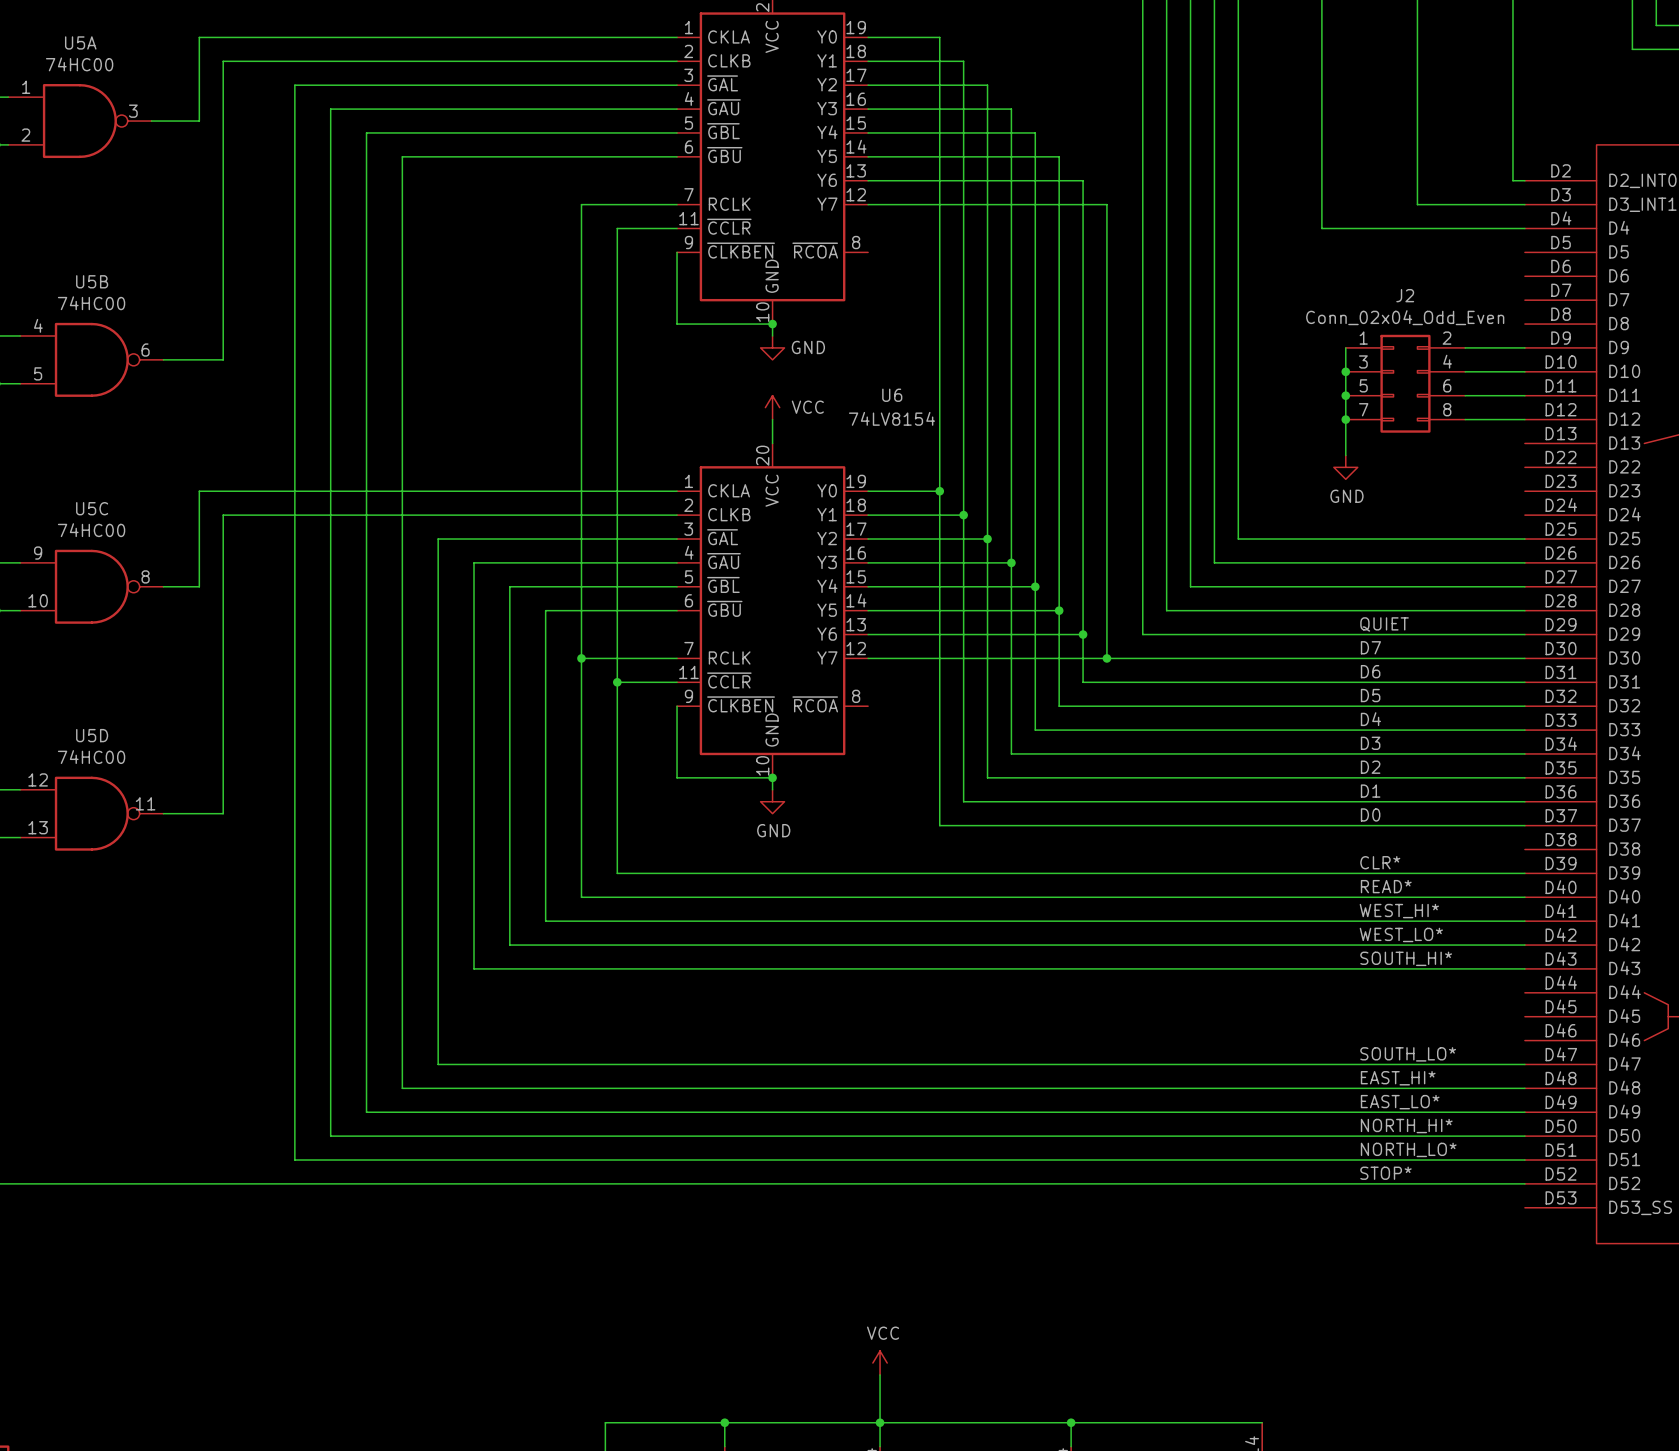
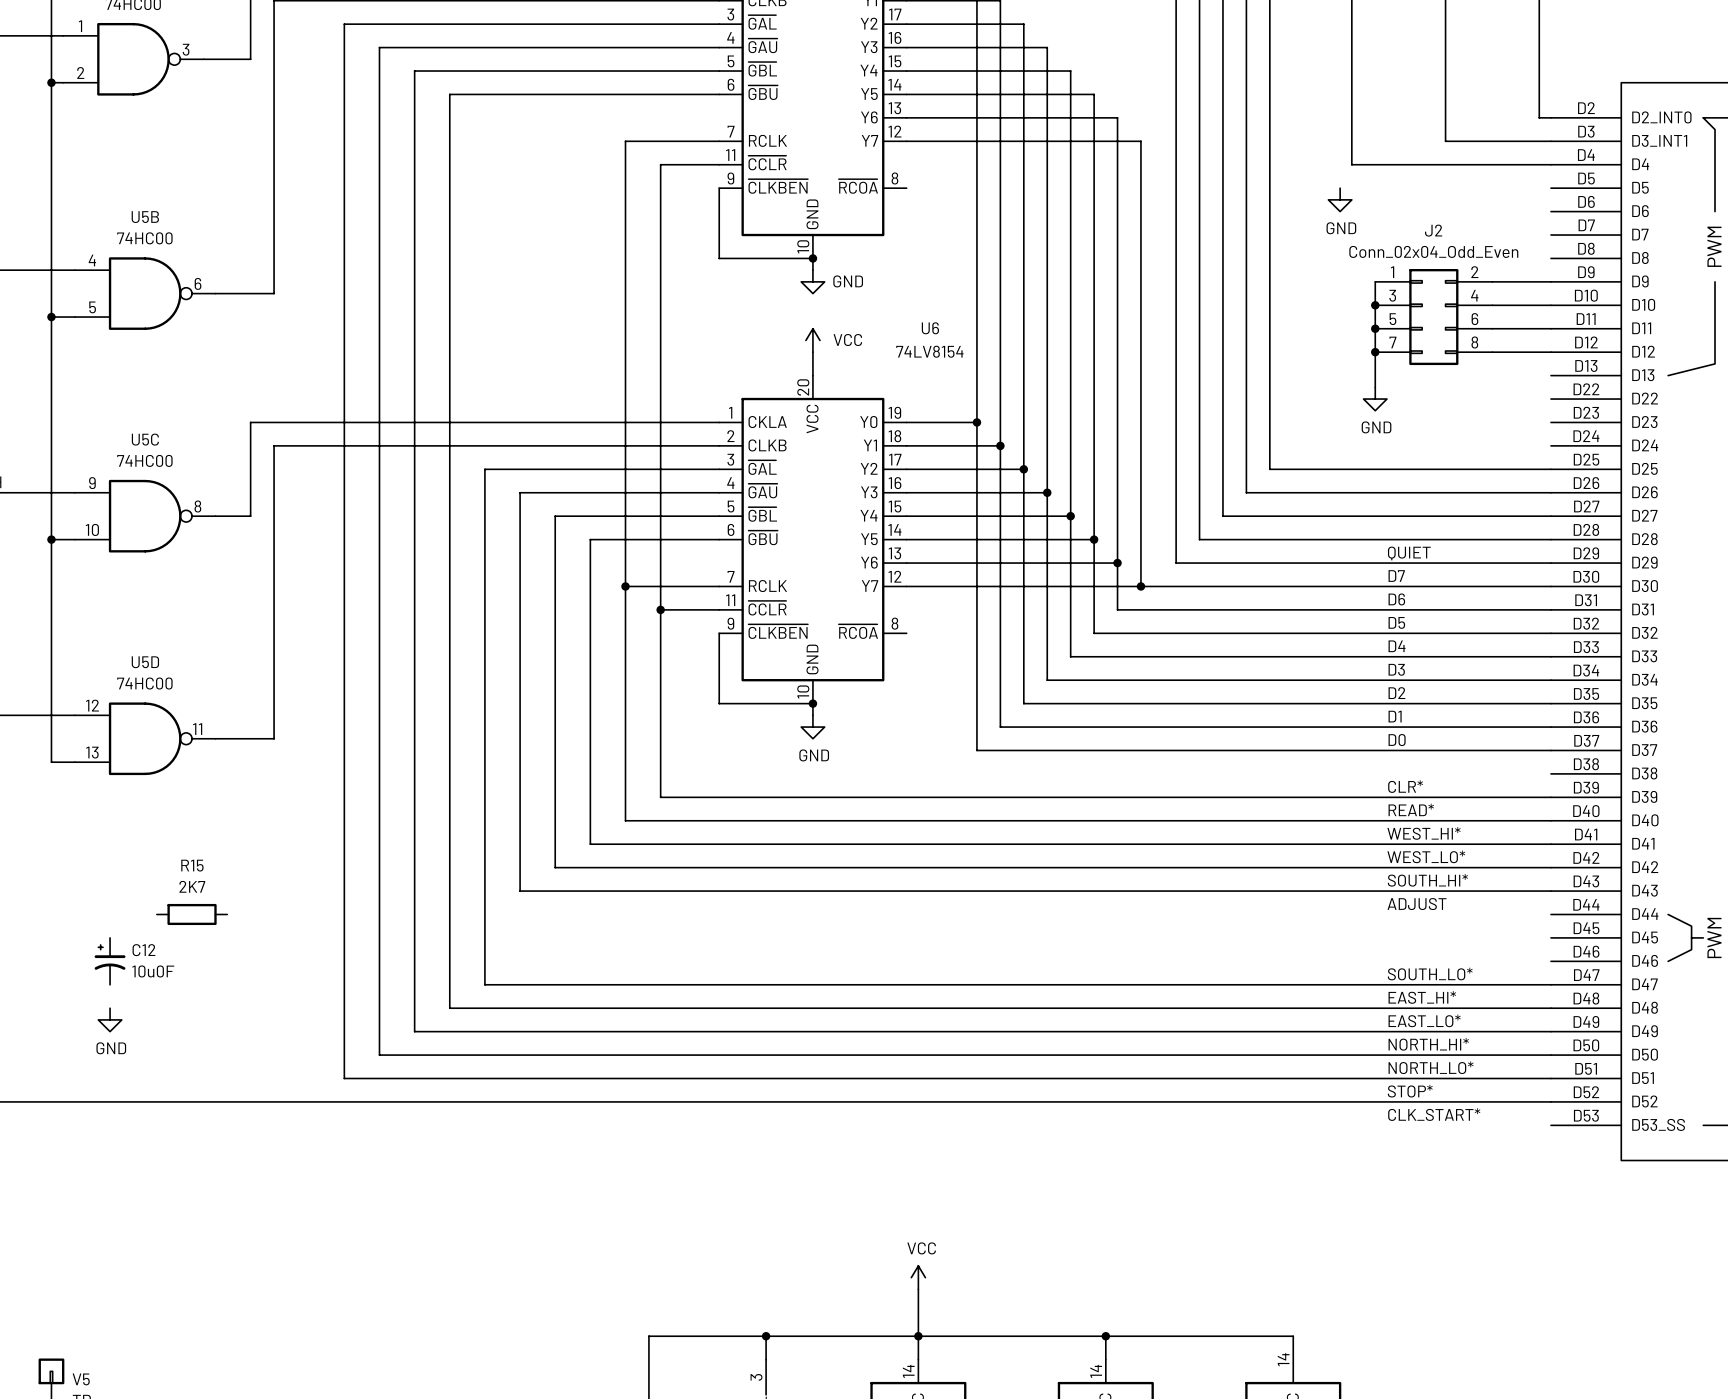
power symbol: none -> GND (1340, 199)
label: none -> ADJUST (1417, 904)
R15: none -> 2K7 (192, 914)
C12: none -> 10u0F (110, 961)
power symbol: none -> GND (110, 1019)
label: none -> CLK_START* (1434, 1114)

